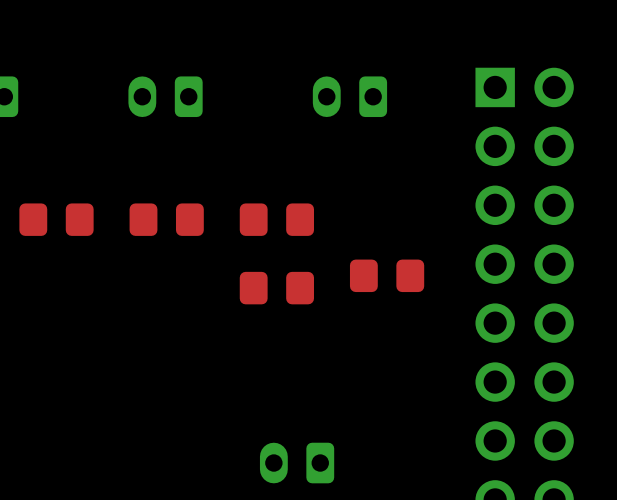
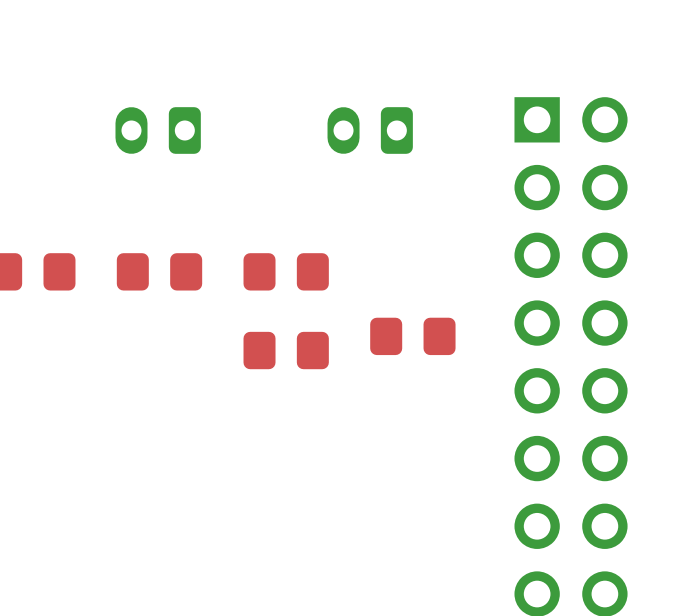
part: (297, 463) -> none

